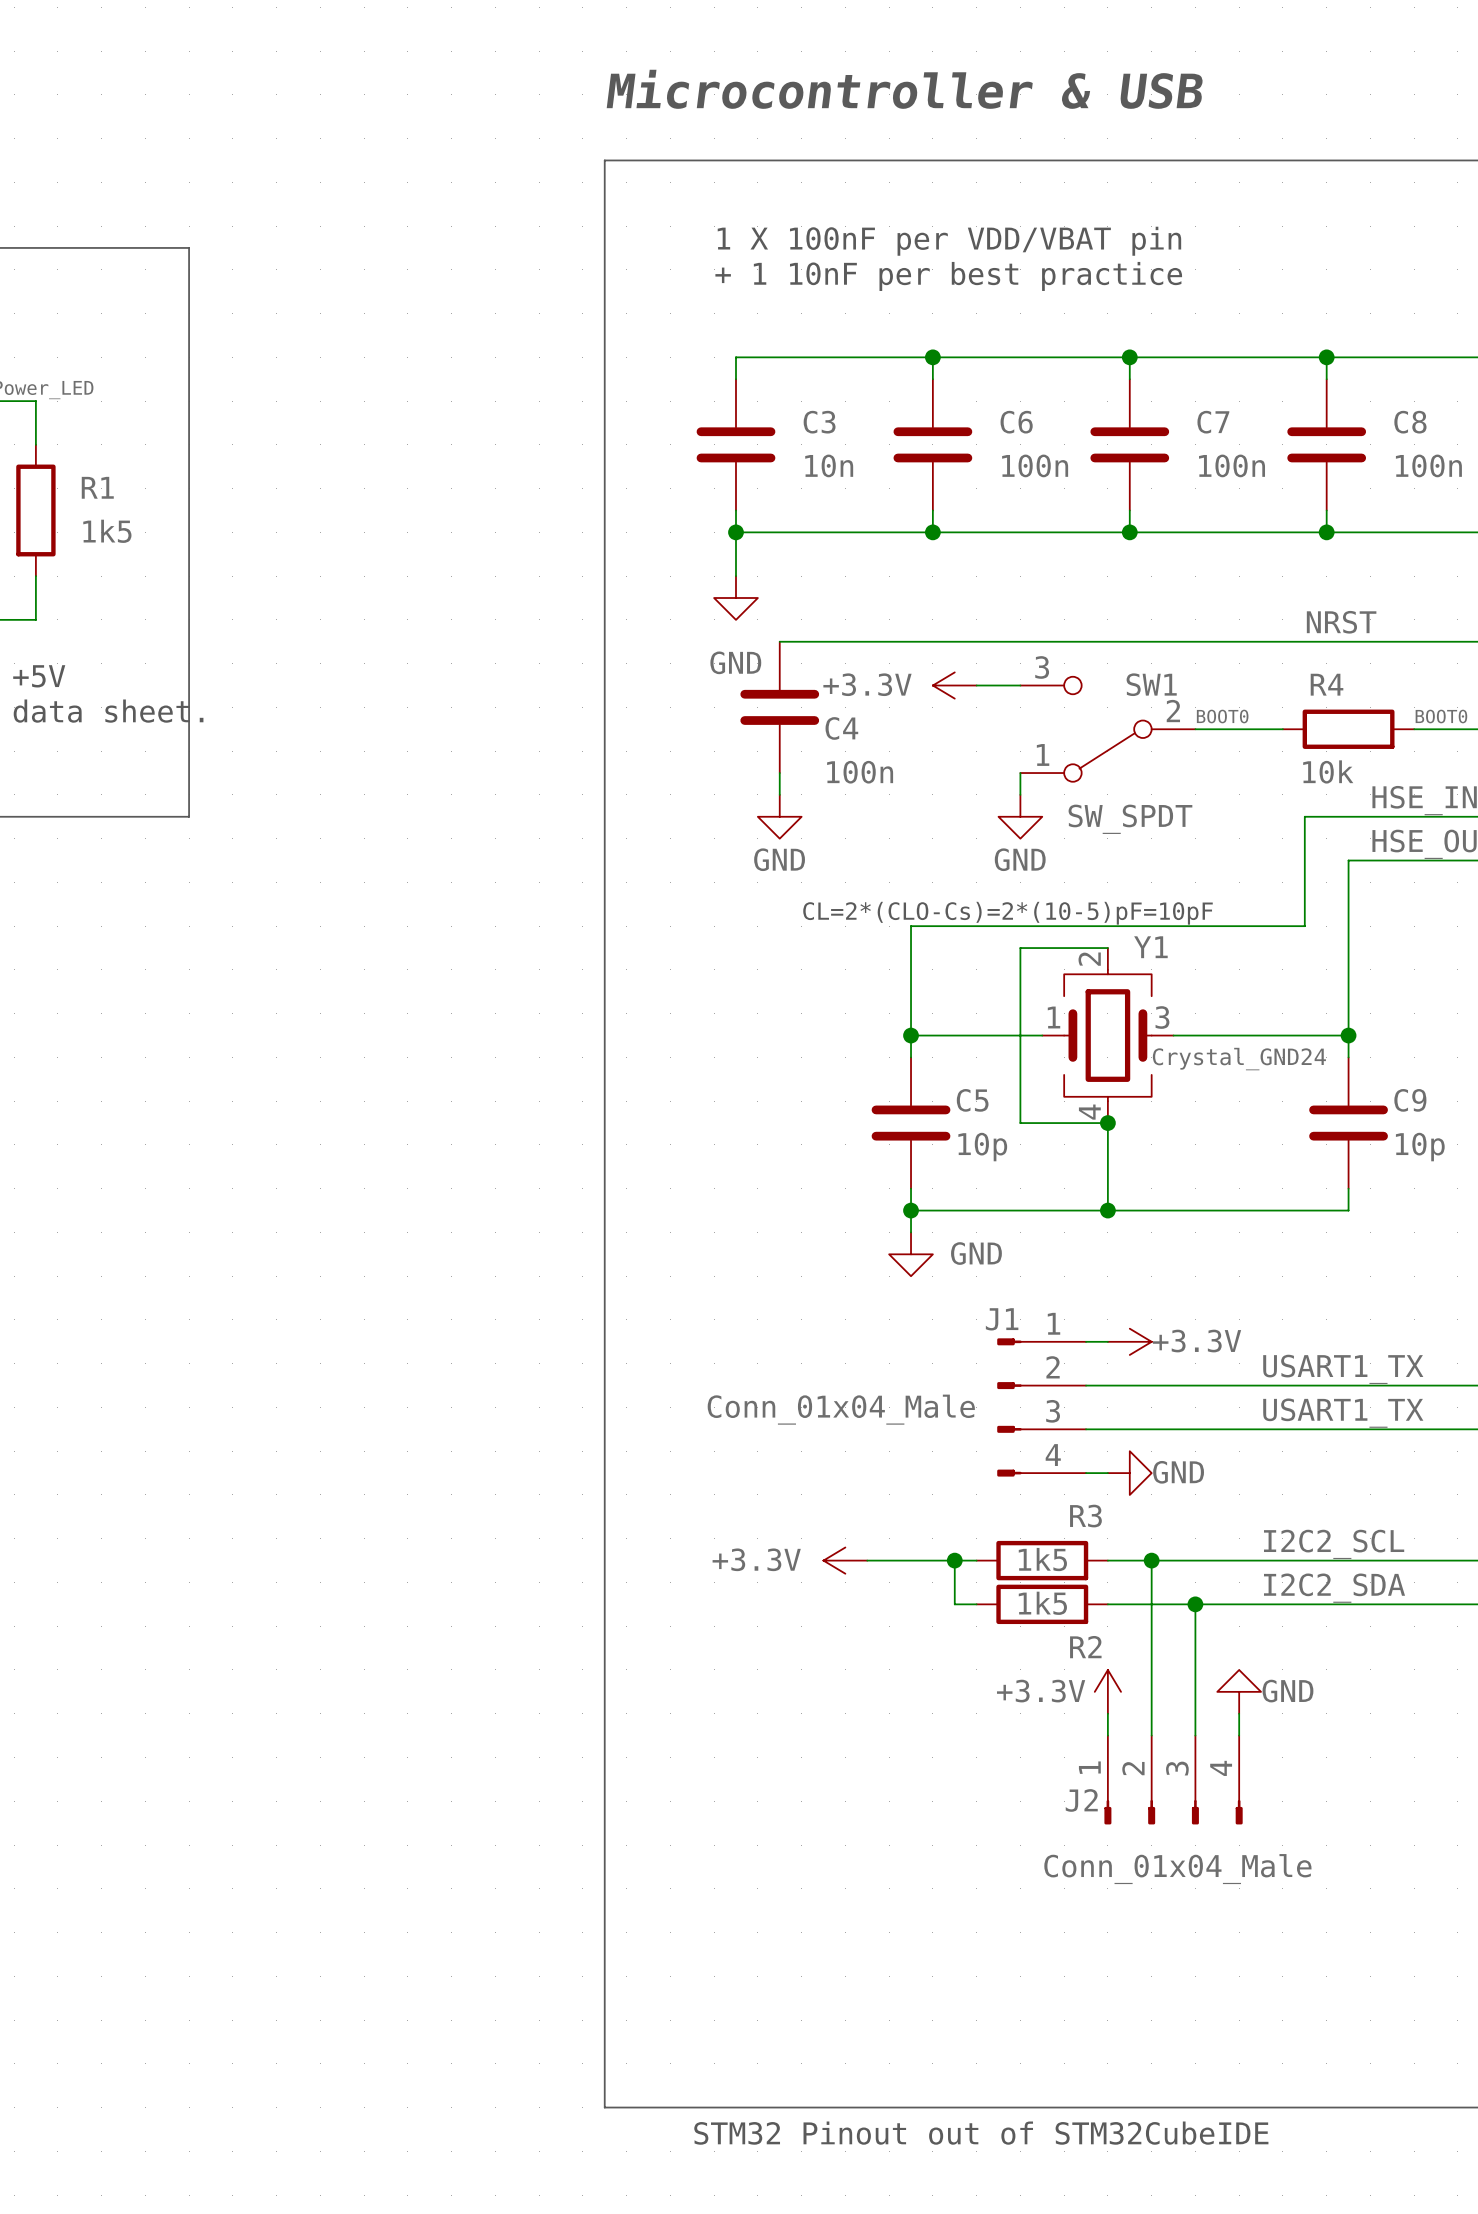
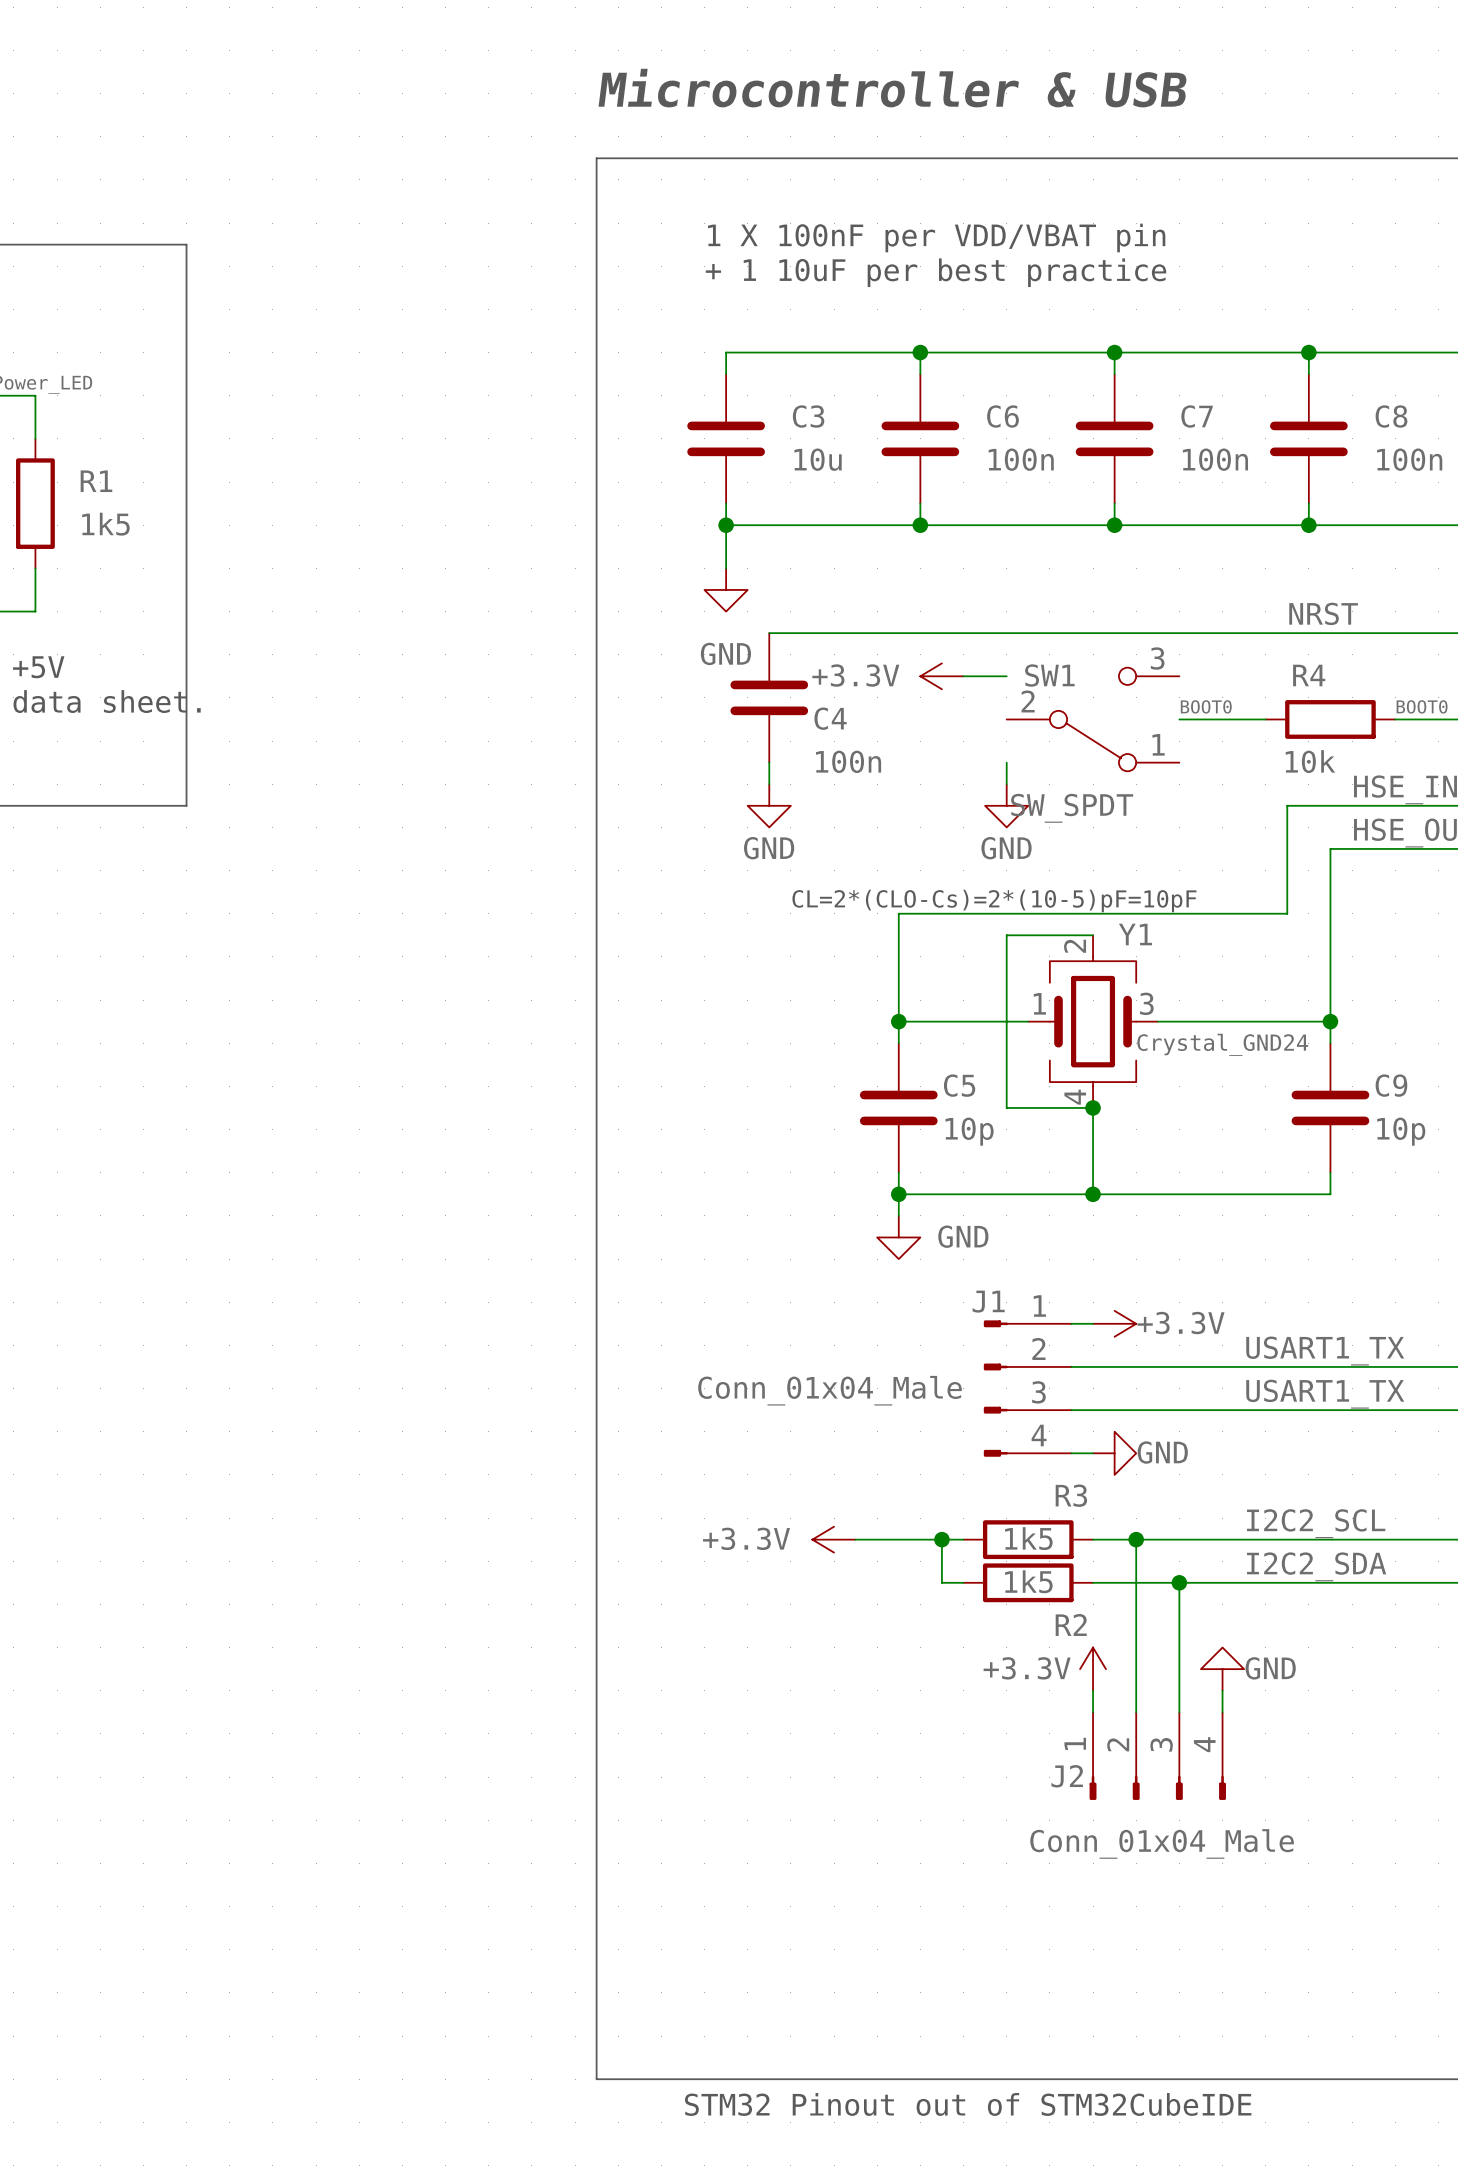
text: + 1 10nF per best practice (948, 276) -> + 1 10uF per best practice (935, 272)
C3 value: 10n (829, 465) -> 10u (818, 459)
SW1 flip: as is (1107, 729) -> left-right (1093, 719)

